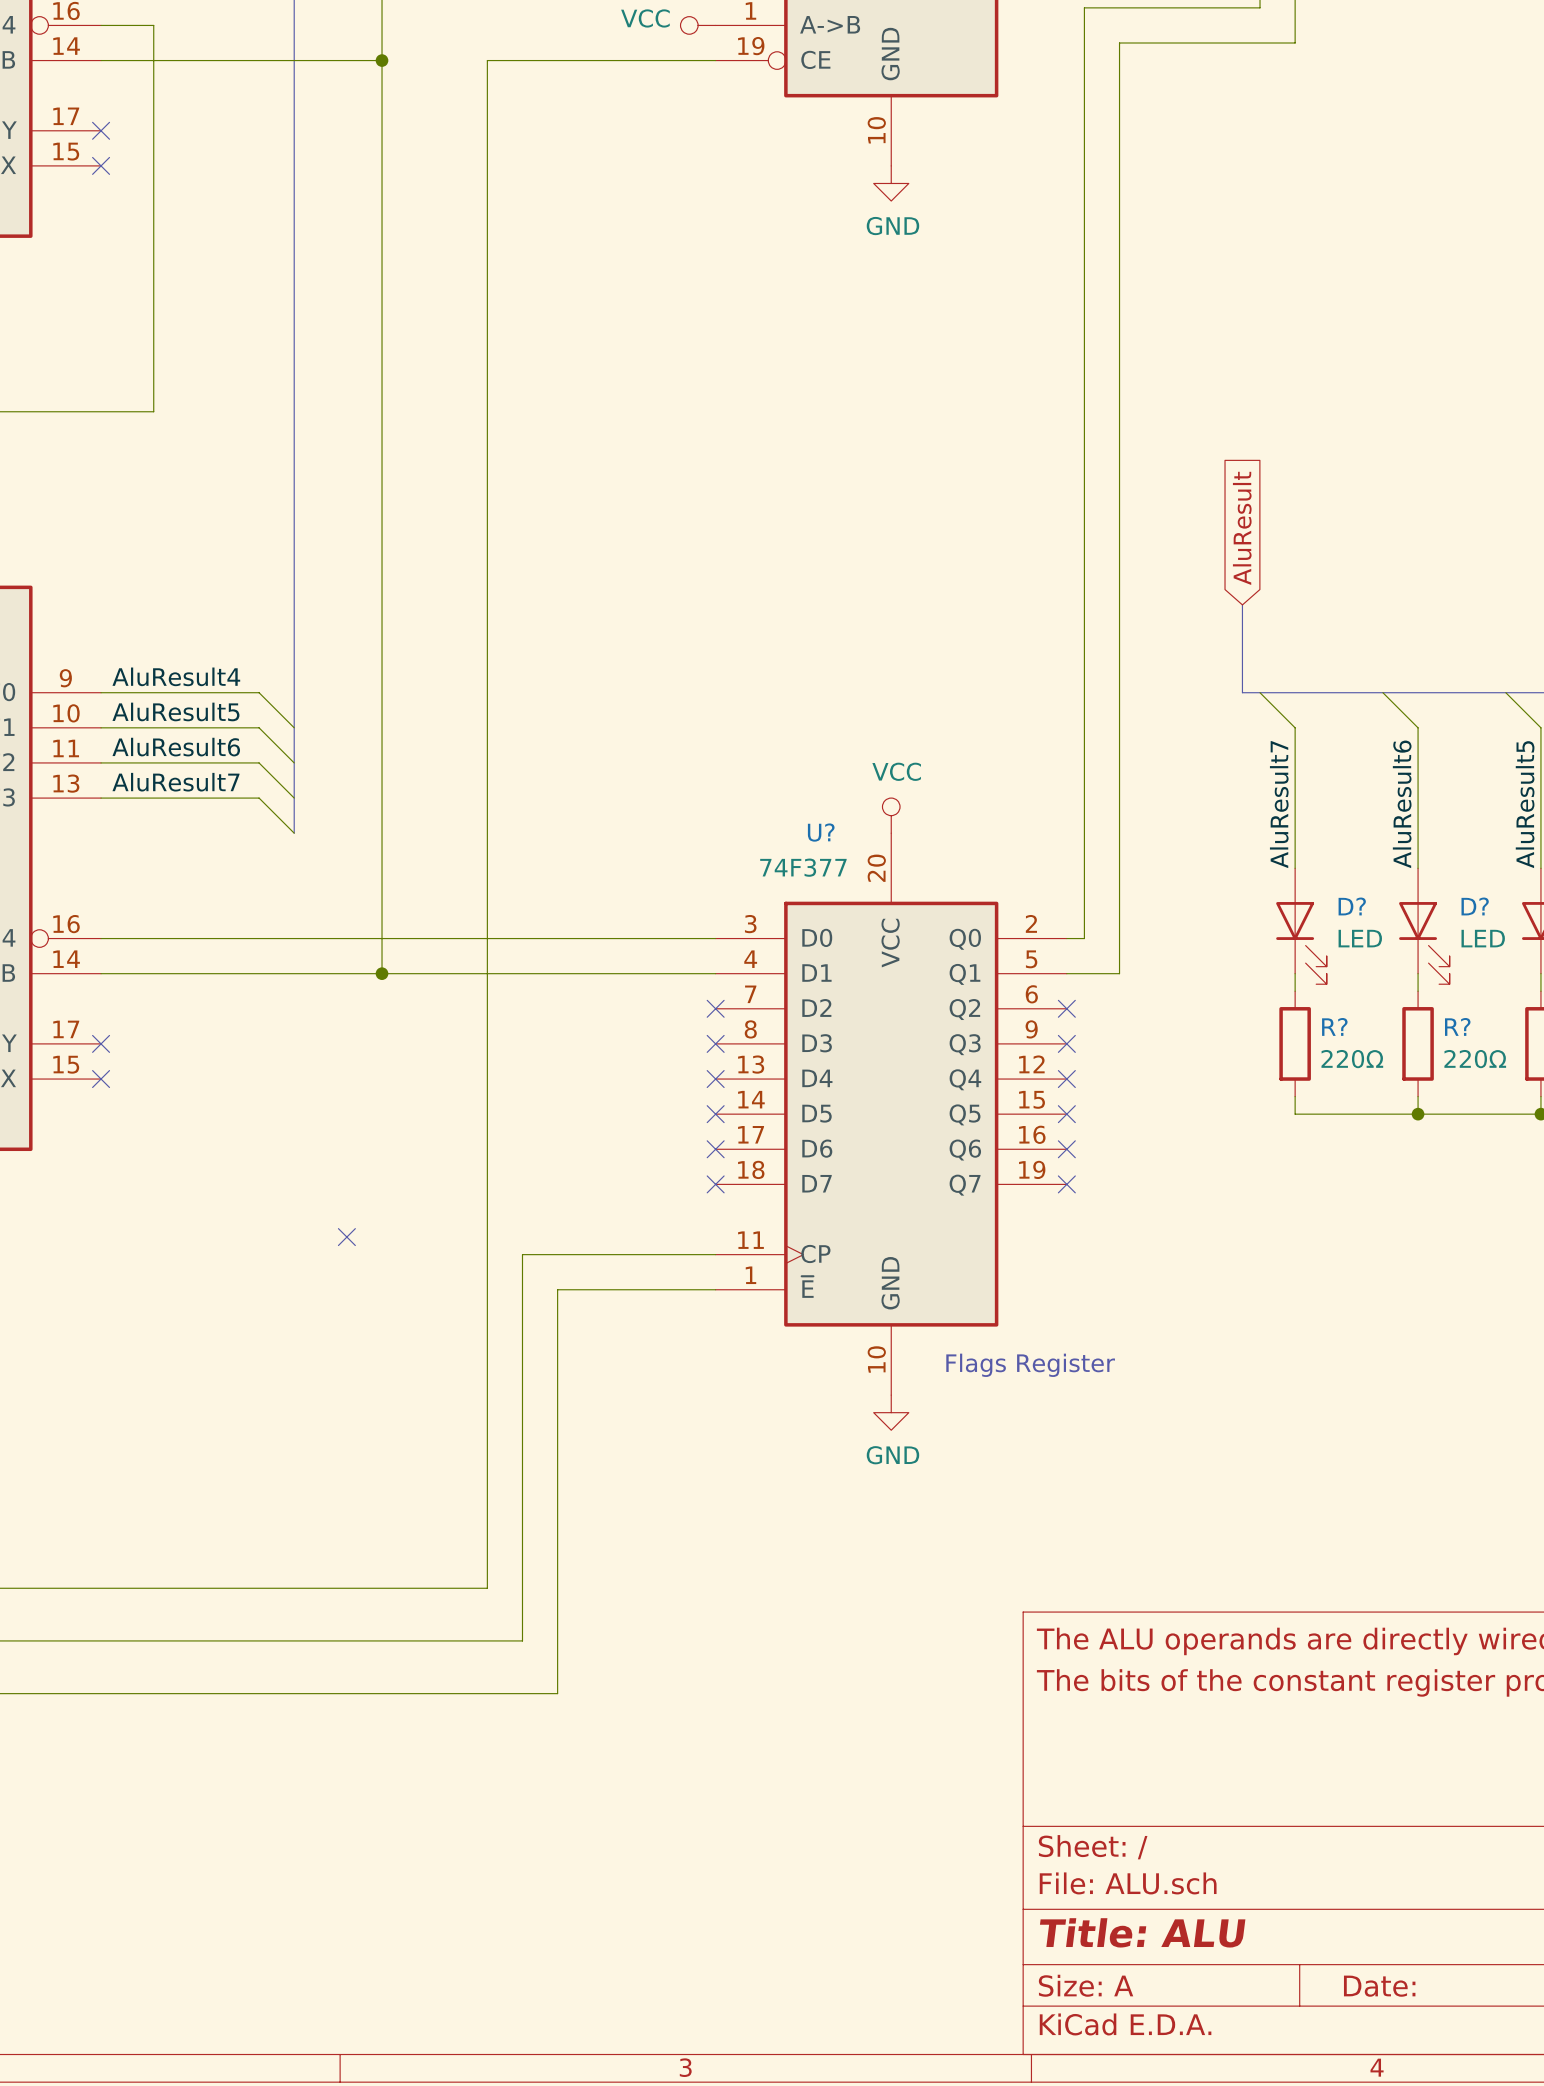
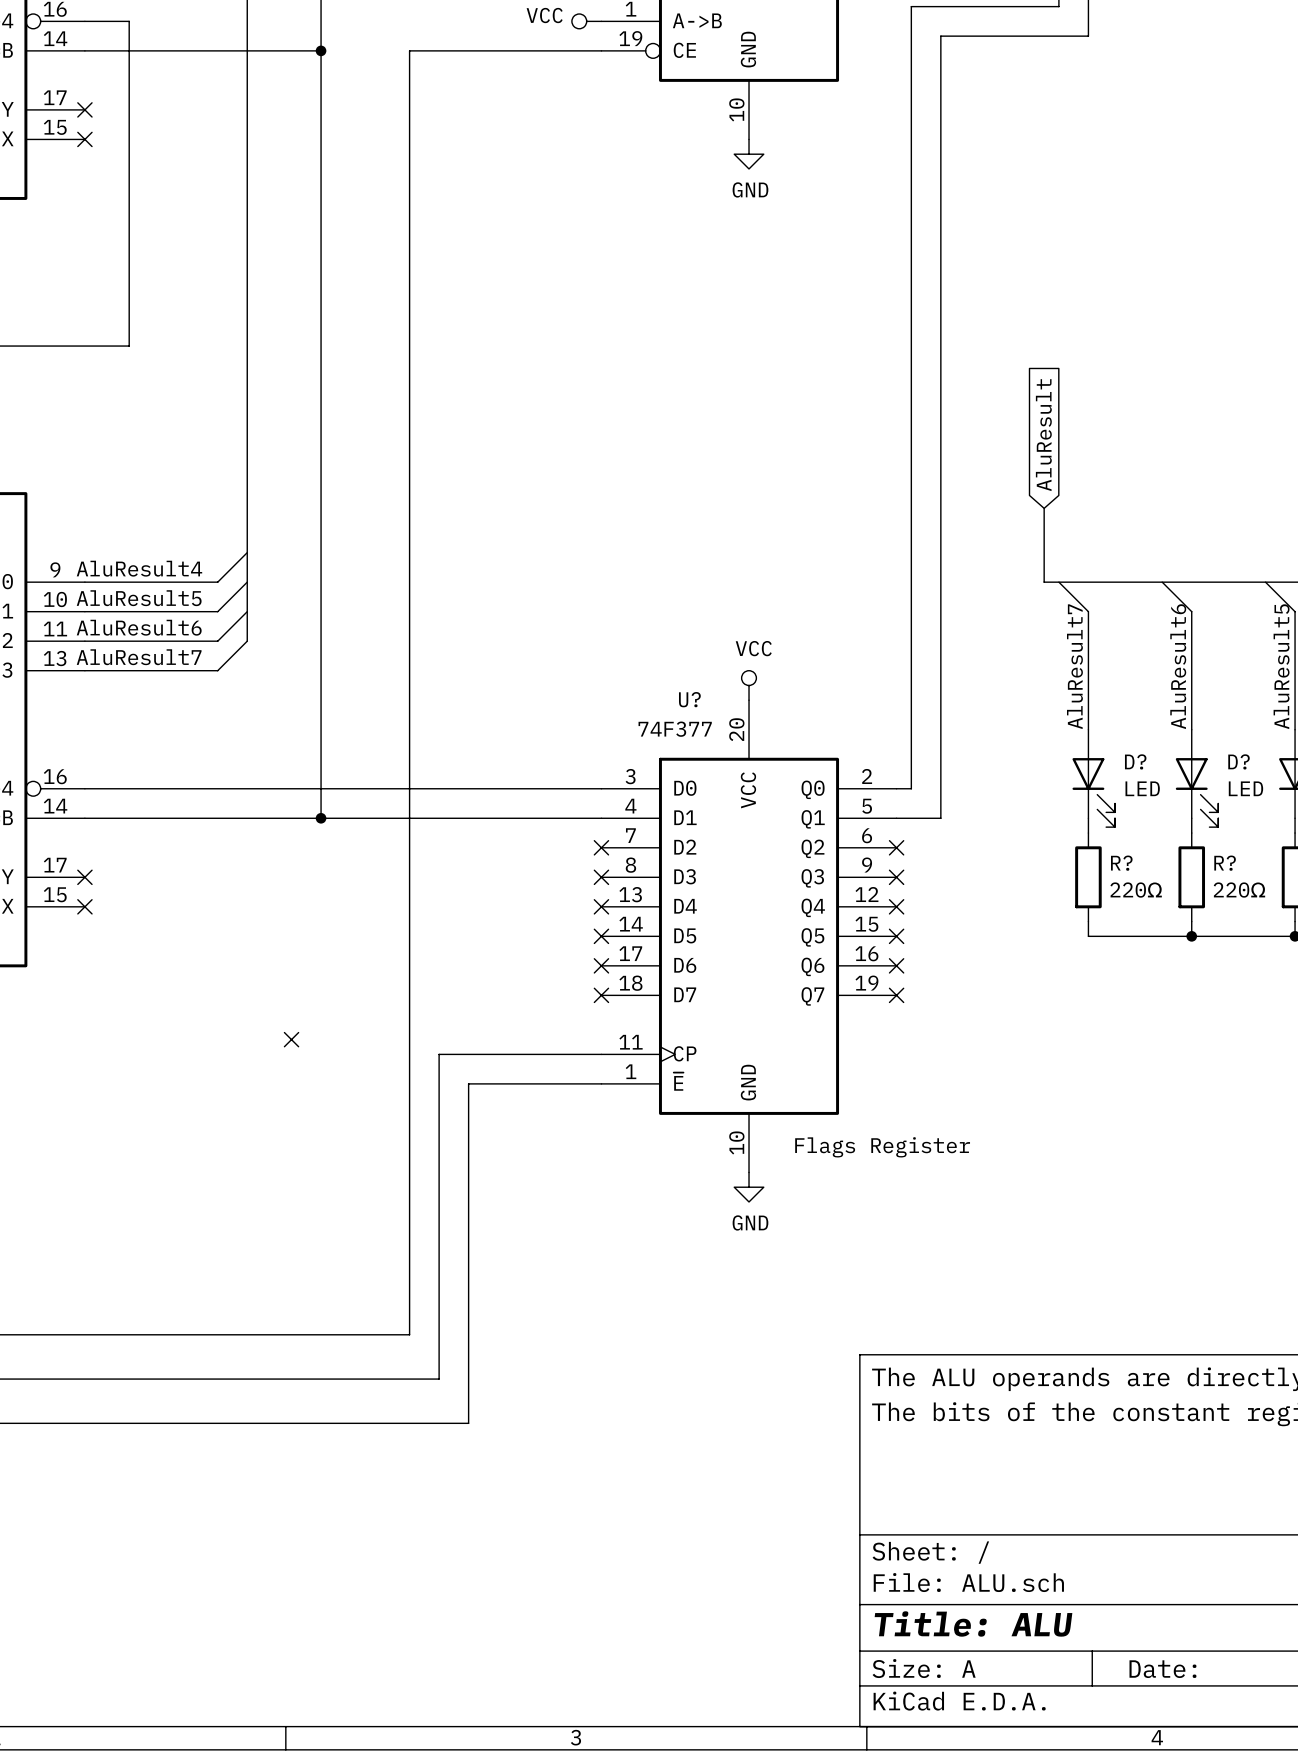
wire: (259, 692) (294, 727) -> (217, 582) (247, 552)
wire: (259, 727) (294, 762) -> (217, 611) (247, 582)
wire: (259, 762) (294, 798) -> (217, 641) (247, 611)
bus: (294, 762) (294, 833) -> none
wire: (259, 798) (294, 833) -> (217, 670) (247, 641)

